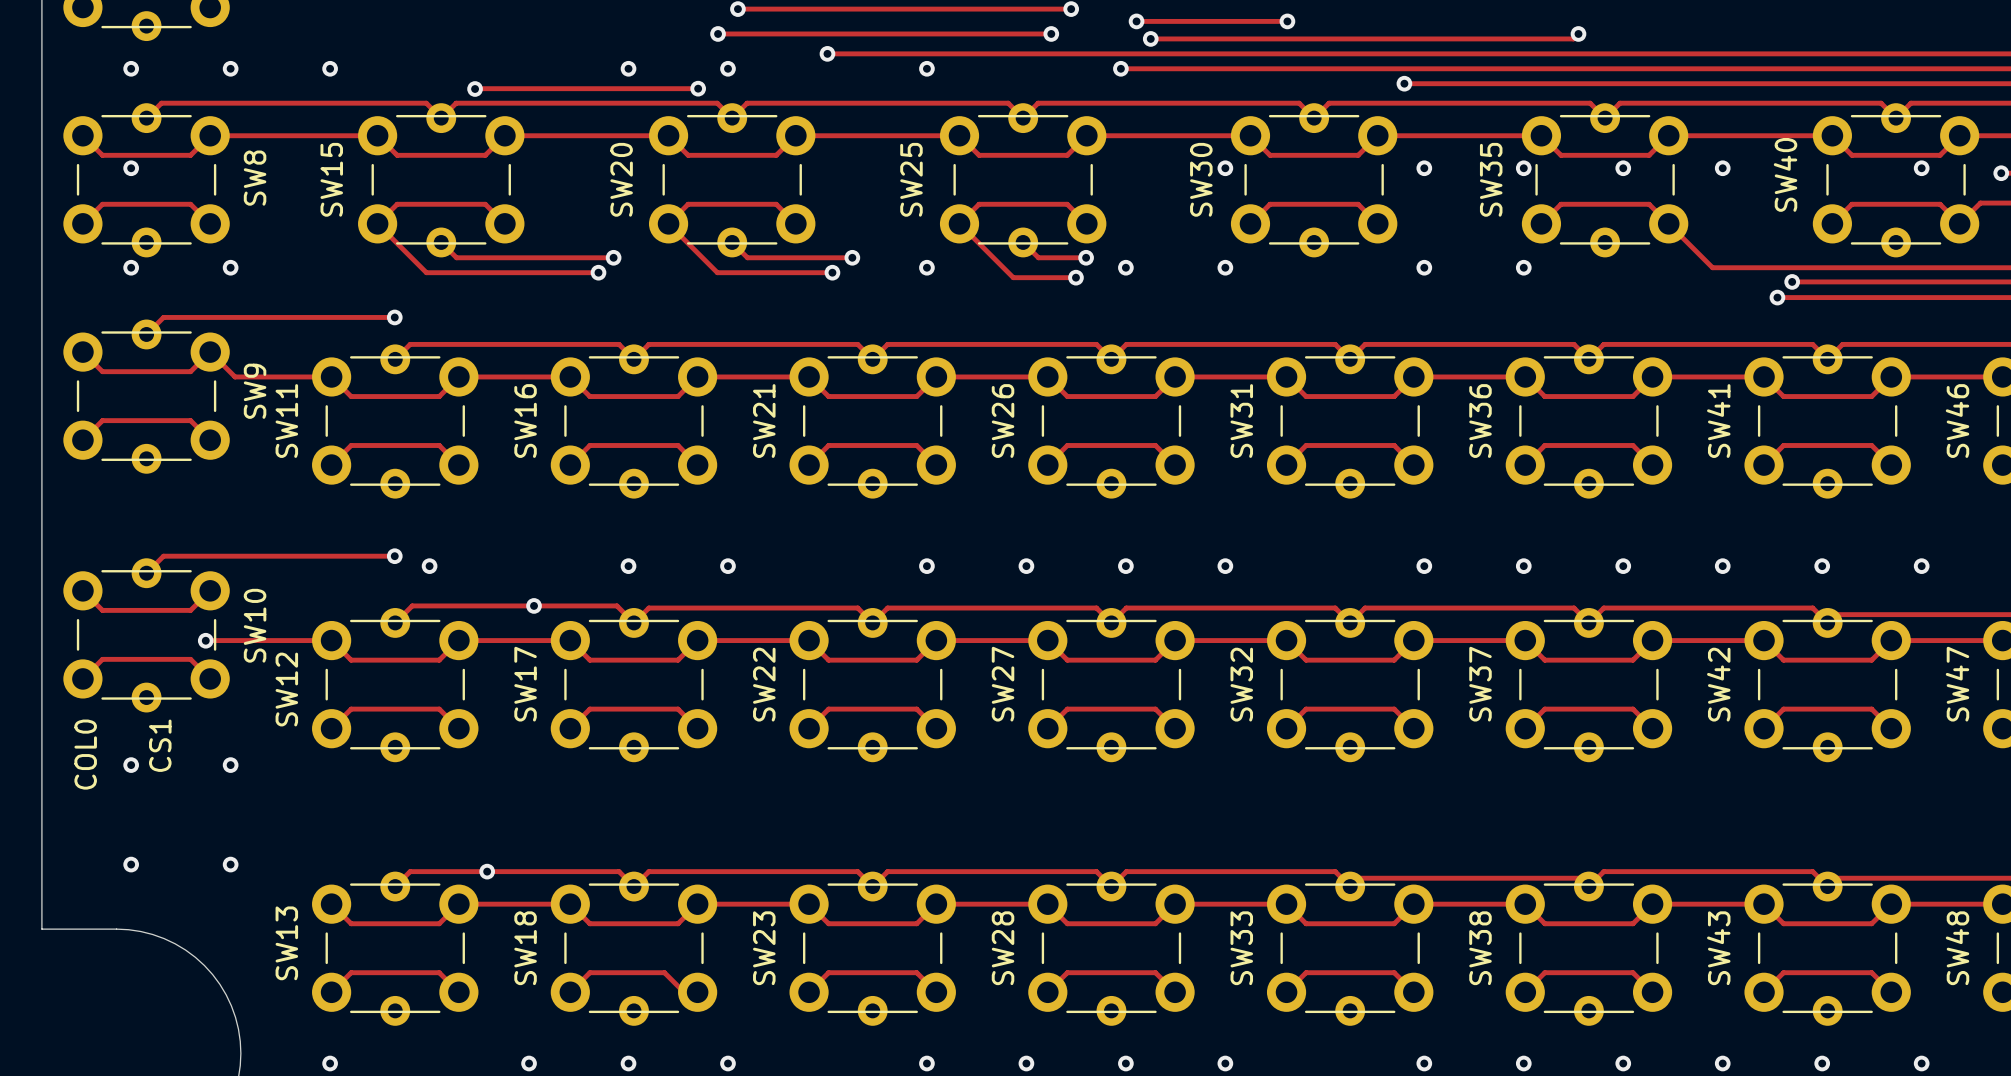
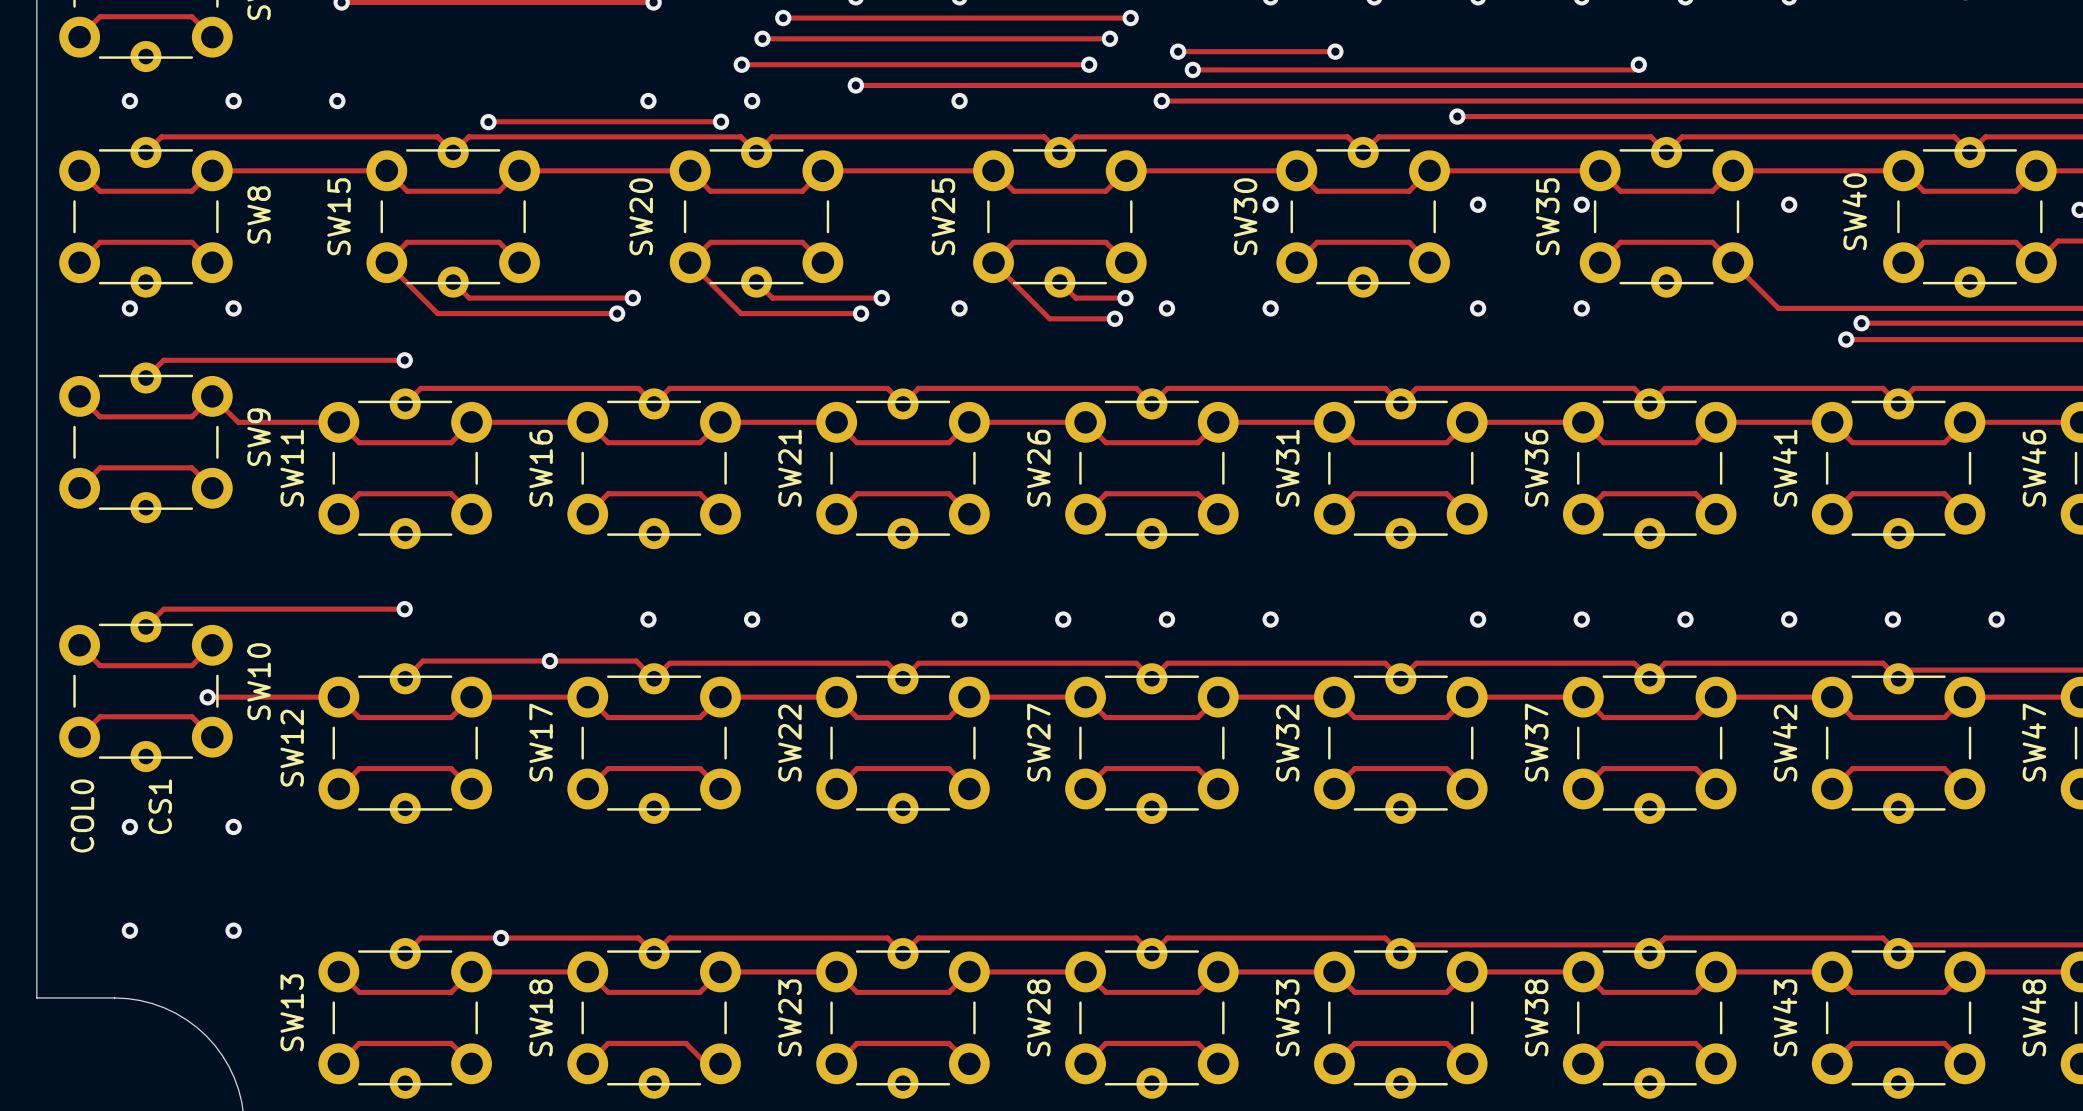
via: (131, 168) -> none
via: (1623, 168) -> none
via: (1921, 168) -> none
via: (429, 566) -> none

